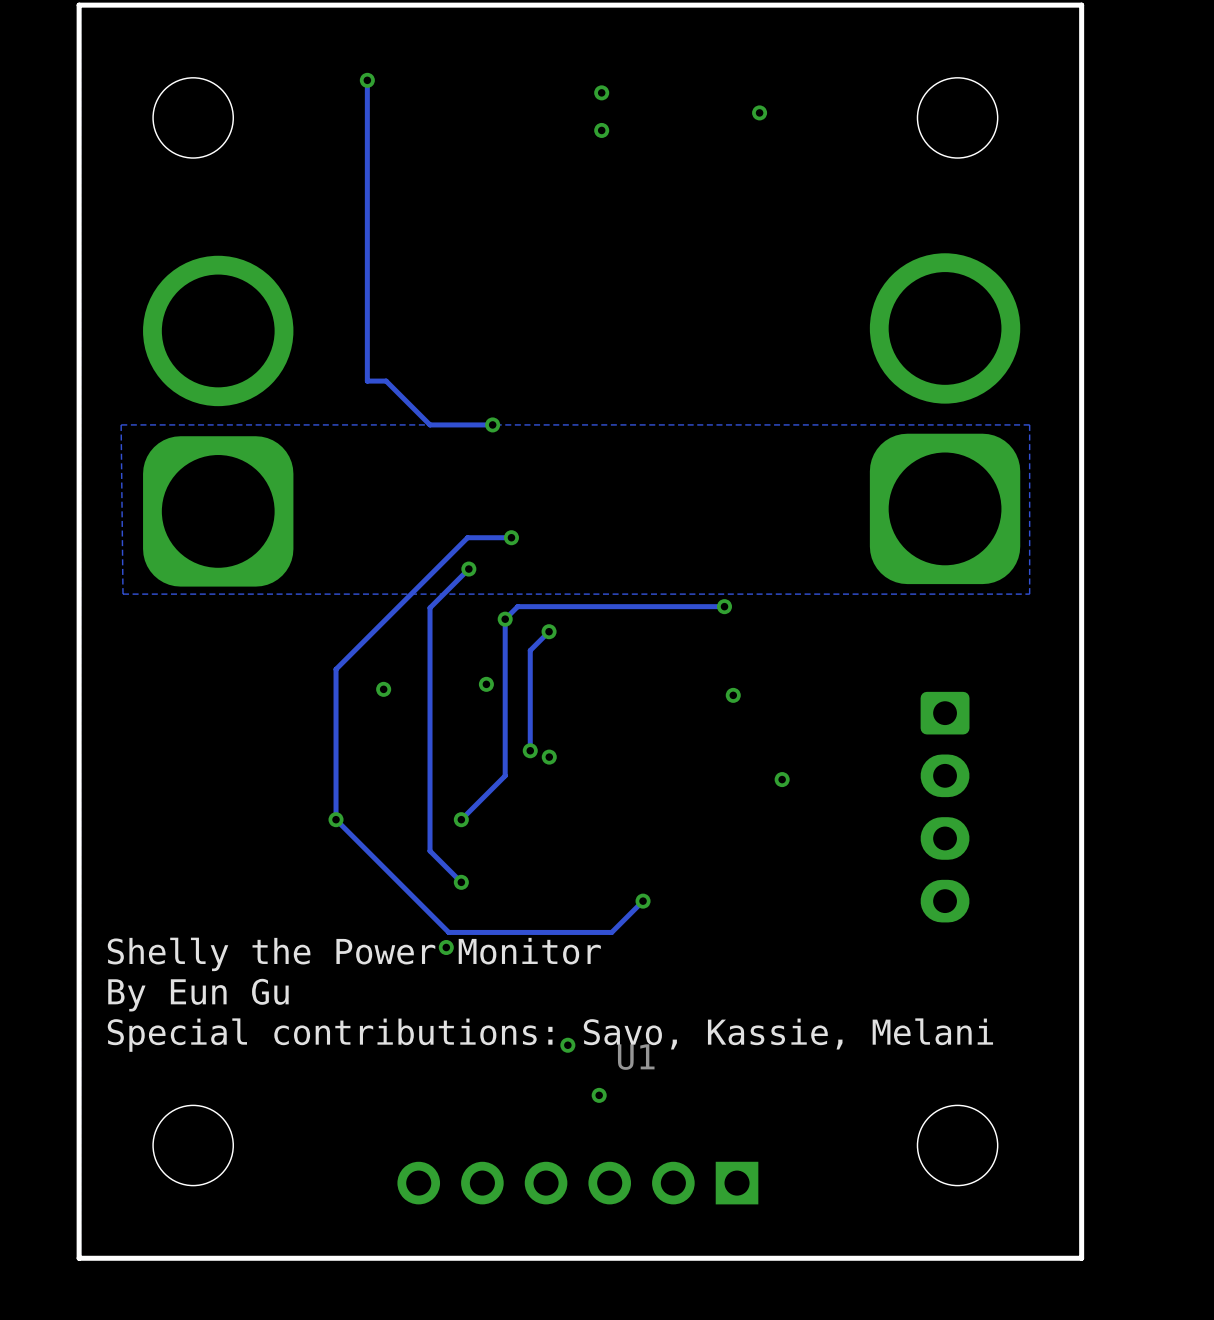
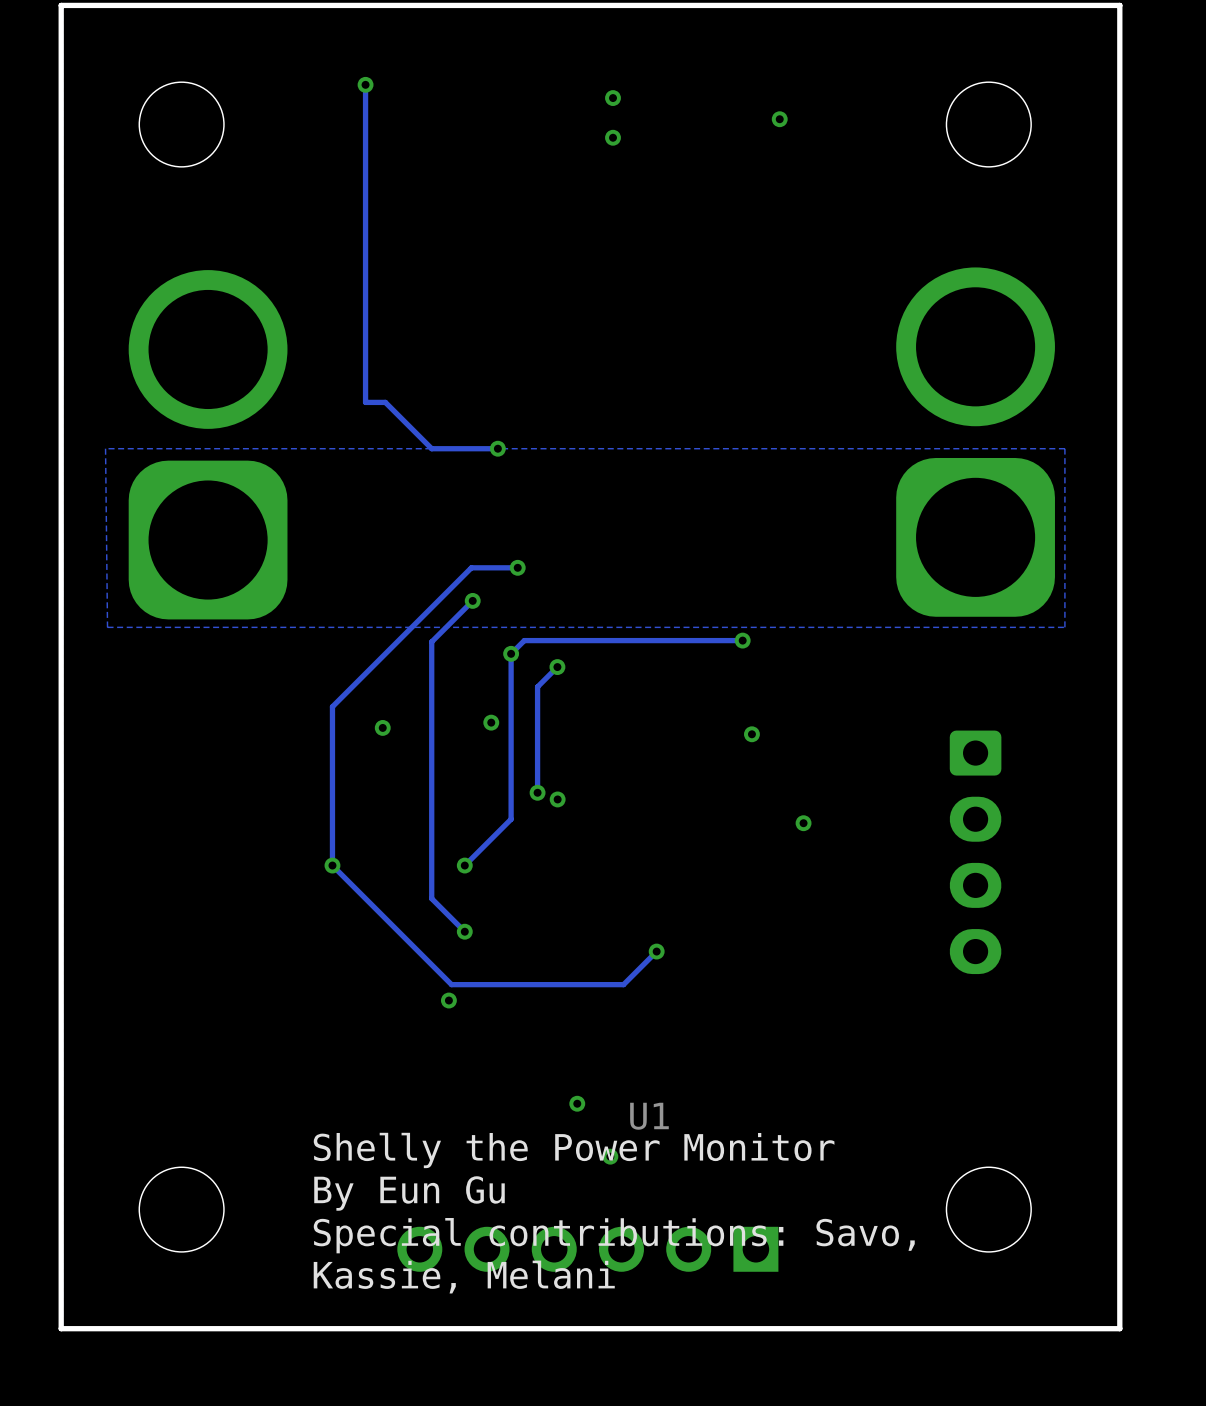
text position: Shelly the Power Monitor (354, 954) -> Shelly the Power Monitor (574, 1150)
text position: By Eun Gu (198, 995) -> By Eun Gu (409, 1193)
text: Special contributions: Savo, Kassie, Melani (550, 1035) -> none
text: none -> Special contributions: Savo, (614, 1235)
text: none -> Kassie, Melani (464, 1277)

